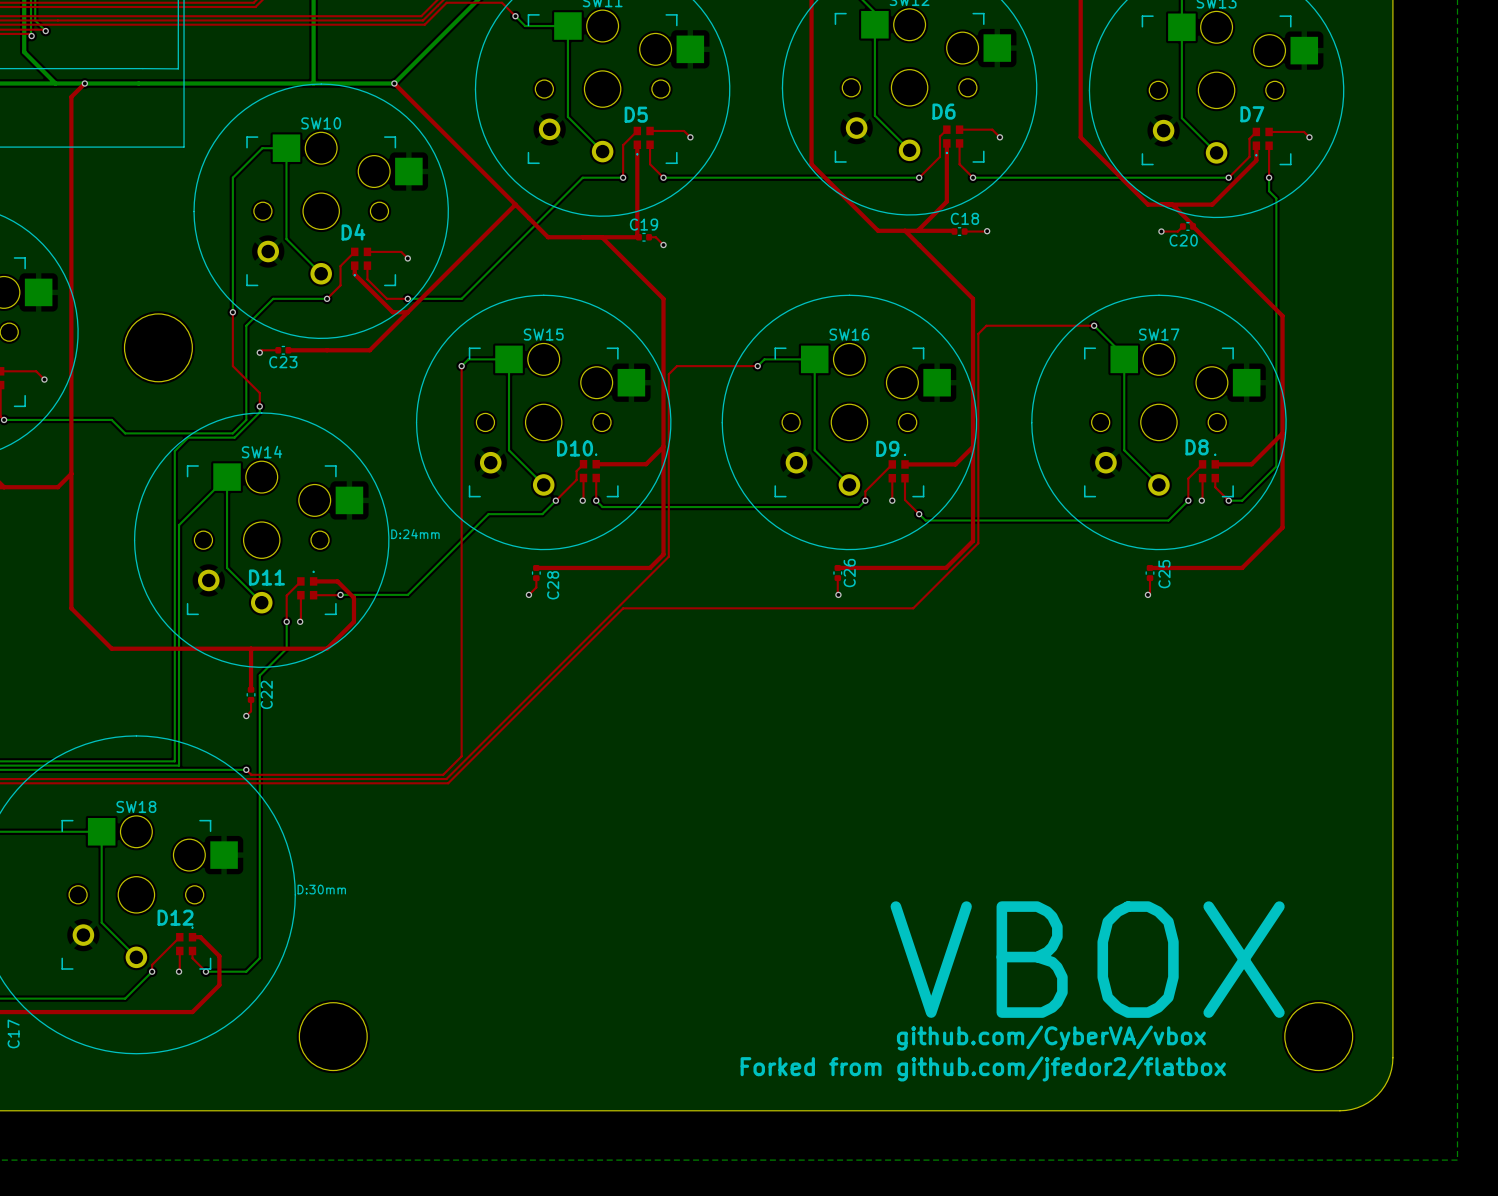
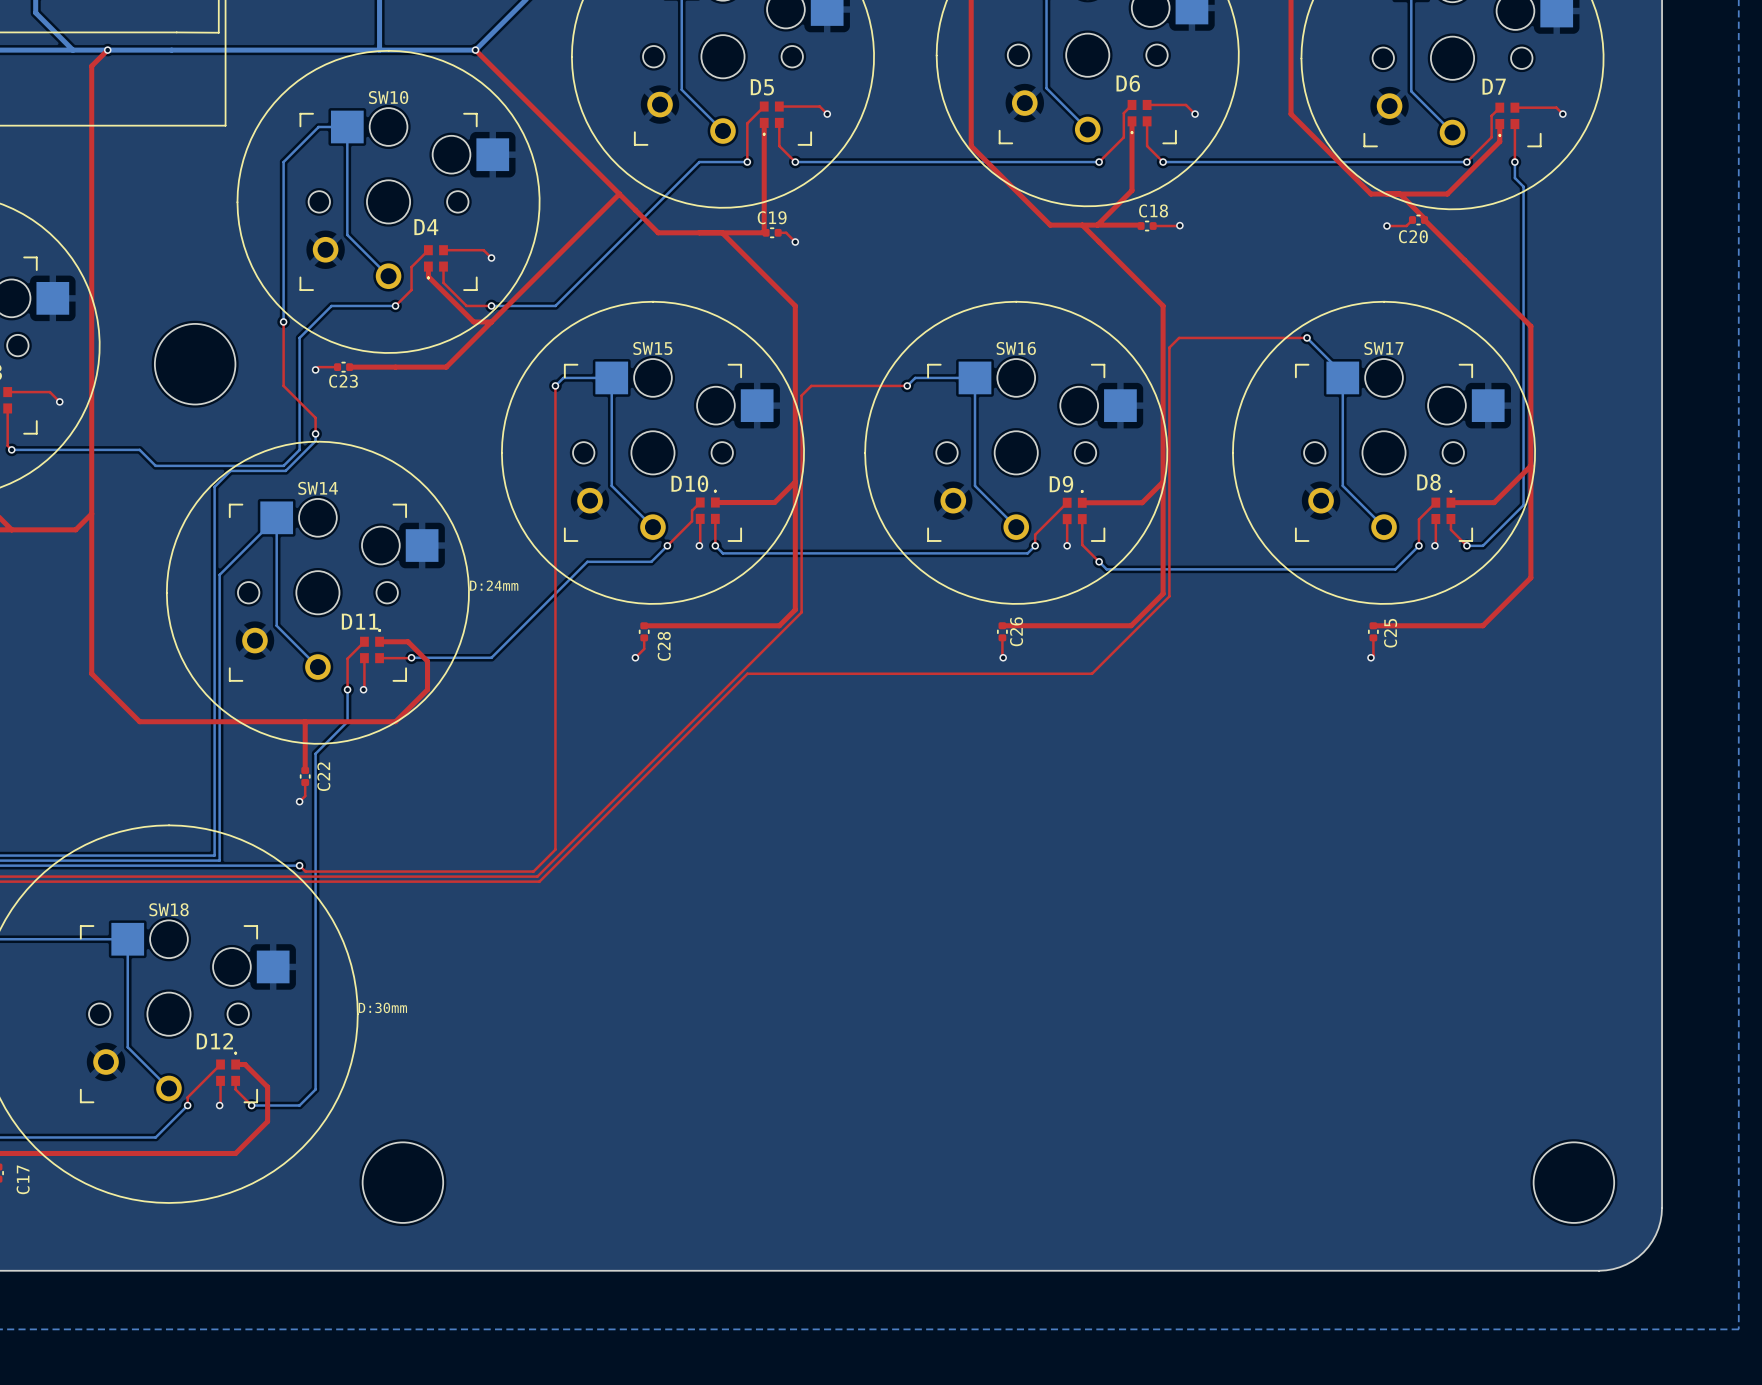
D11 name position: D11 (266, 577) -> D11 (360, 621)
text: VBOX (1087, 959) -> none
text: github.com/CyberVA/vbox (1051, 1038) -> none
text: Forked from github.com/jfedor2/flatbox (983, 1068) -> none

